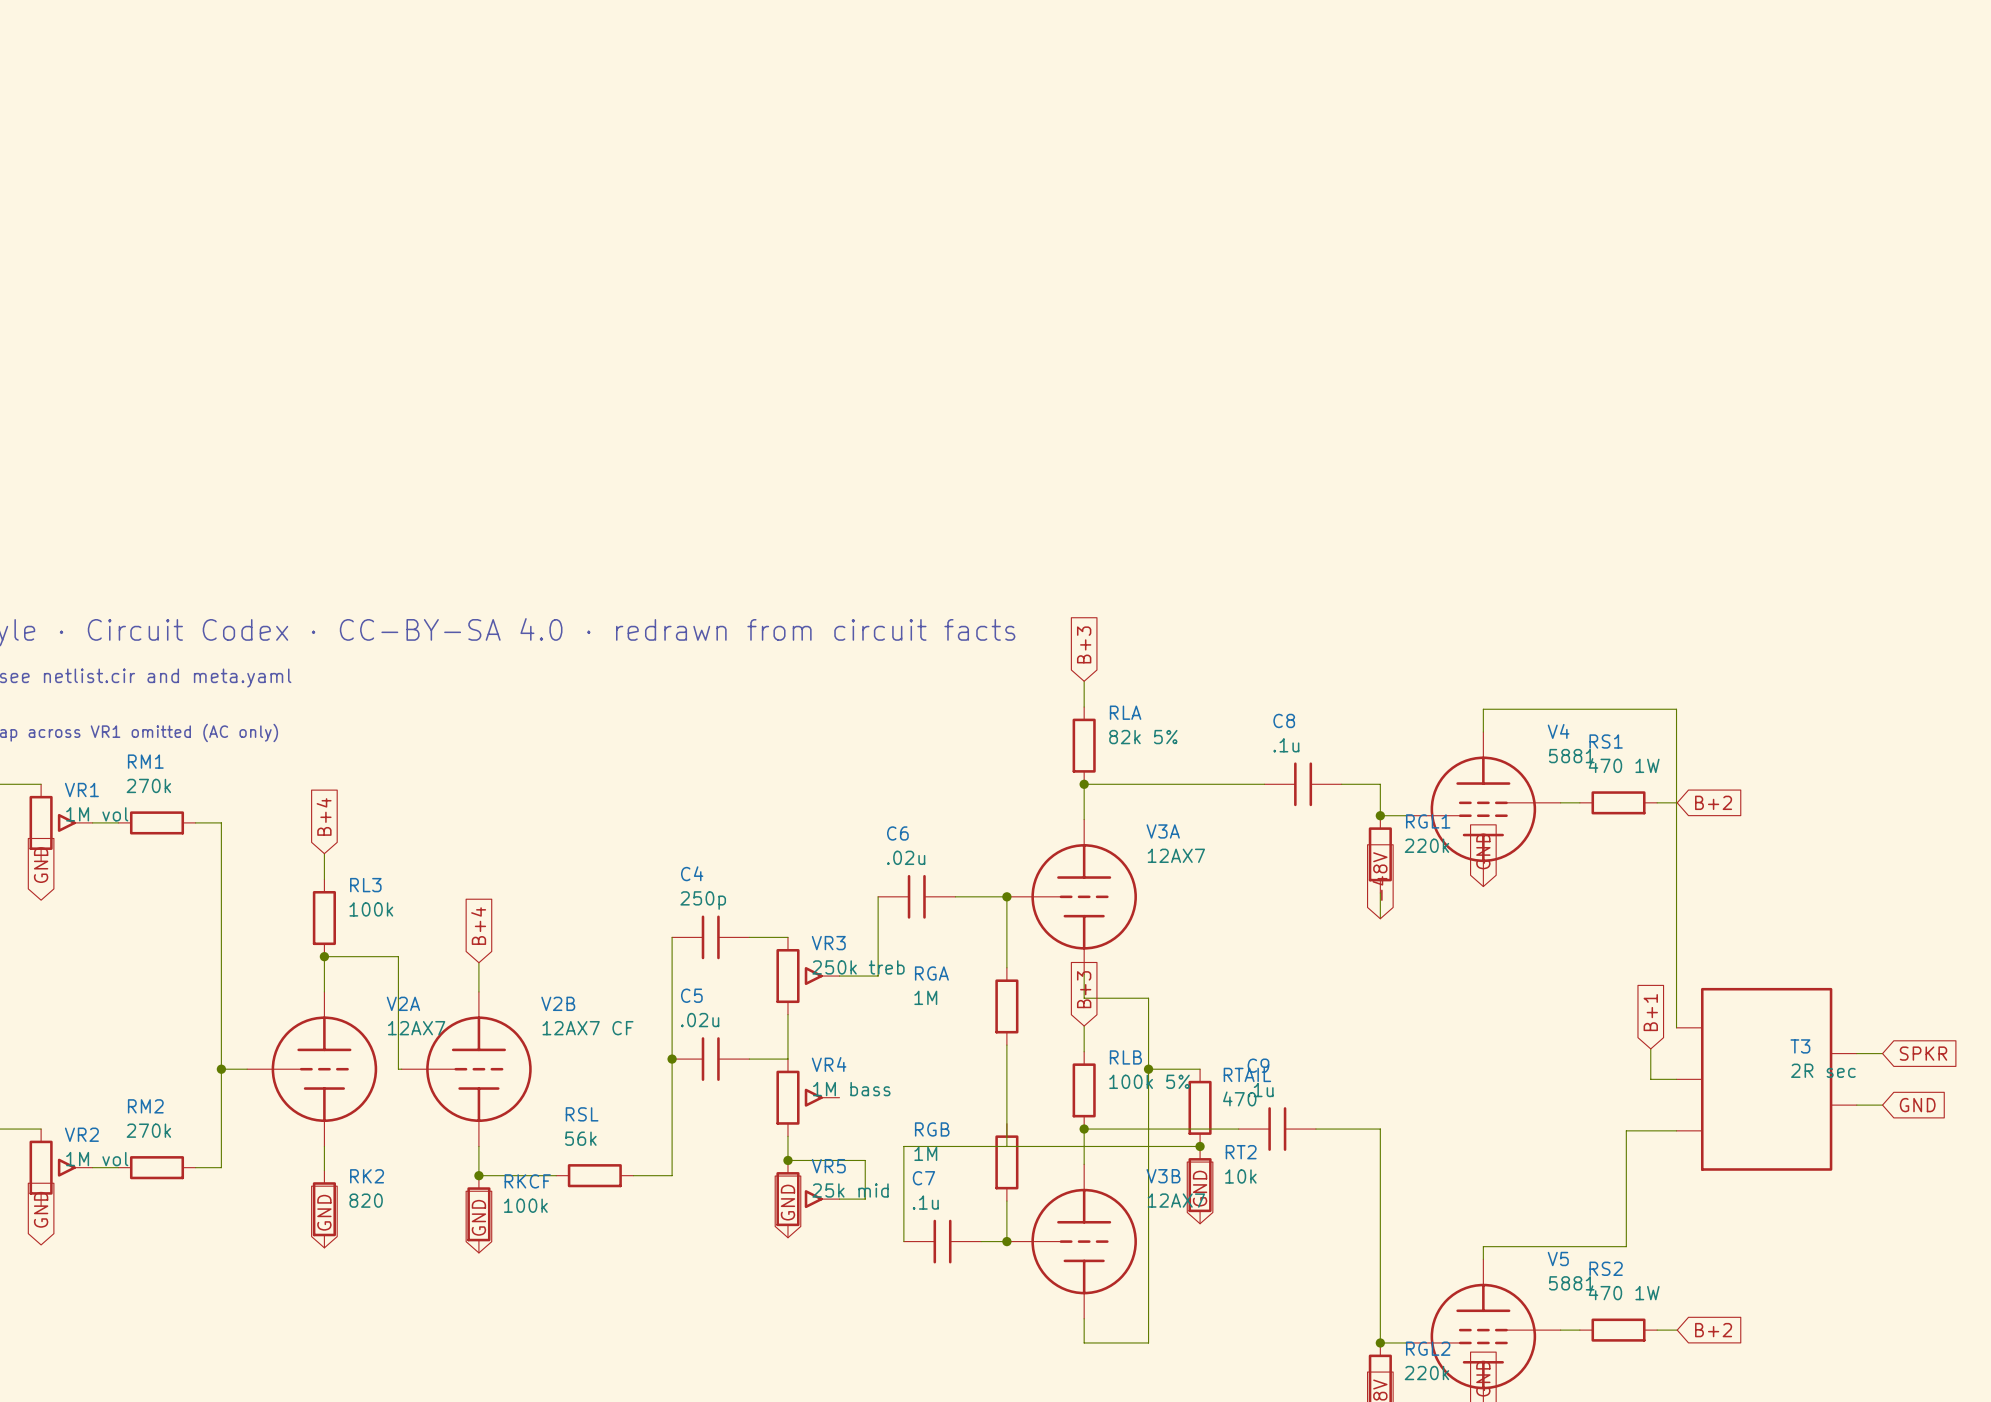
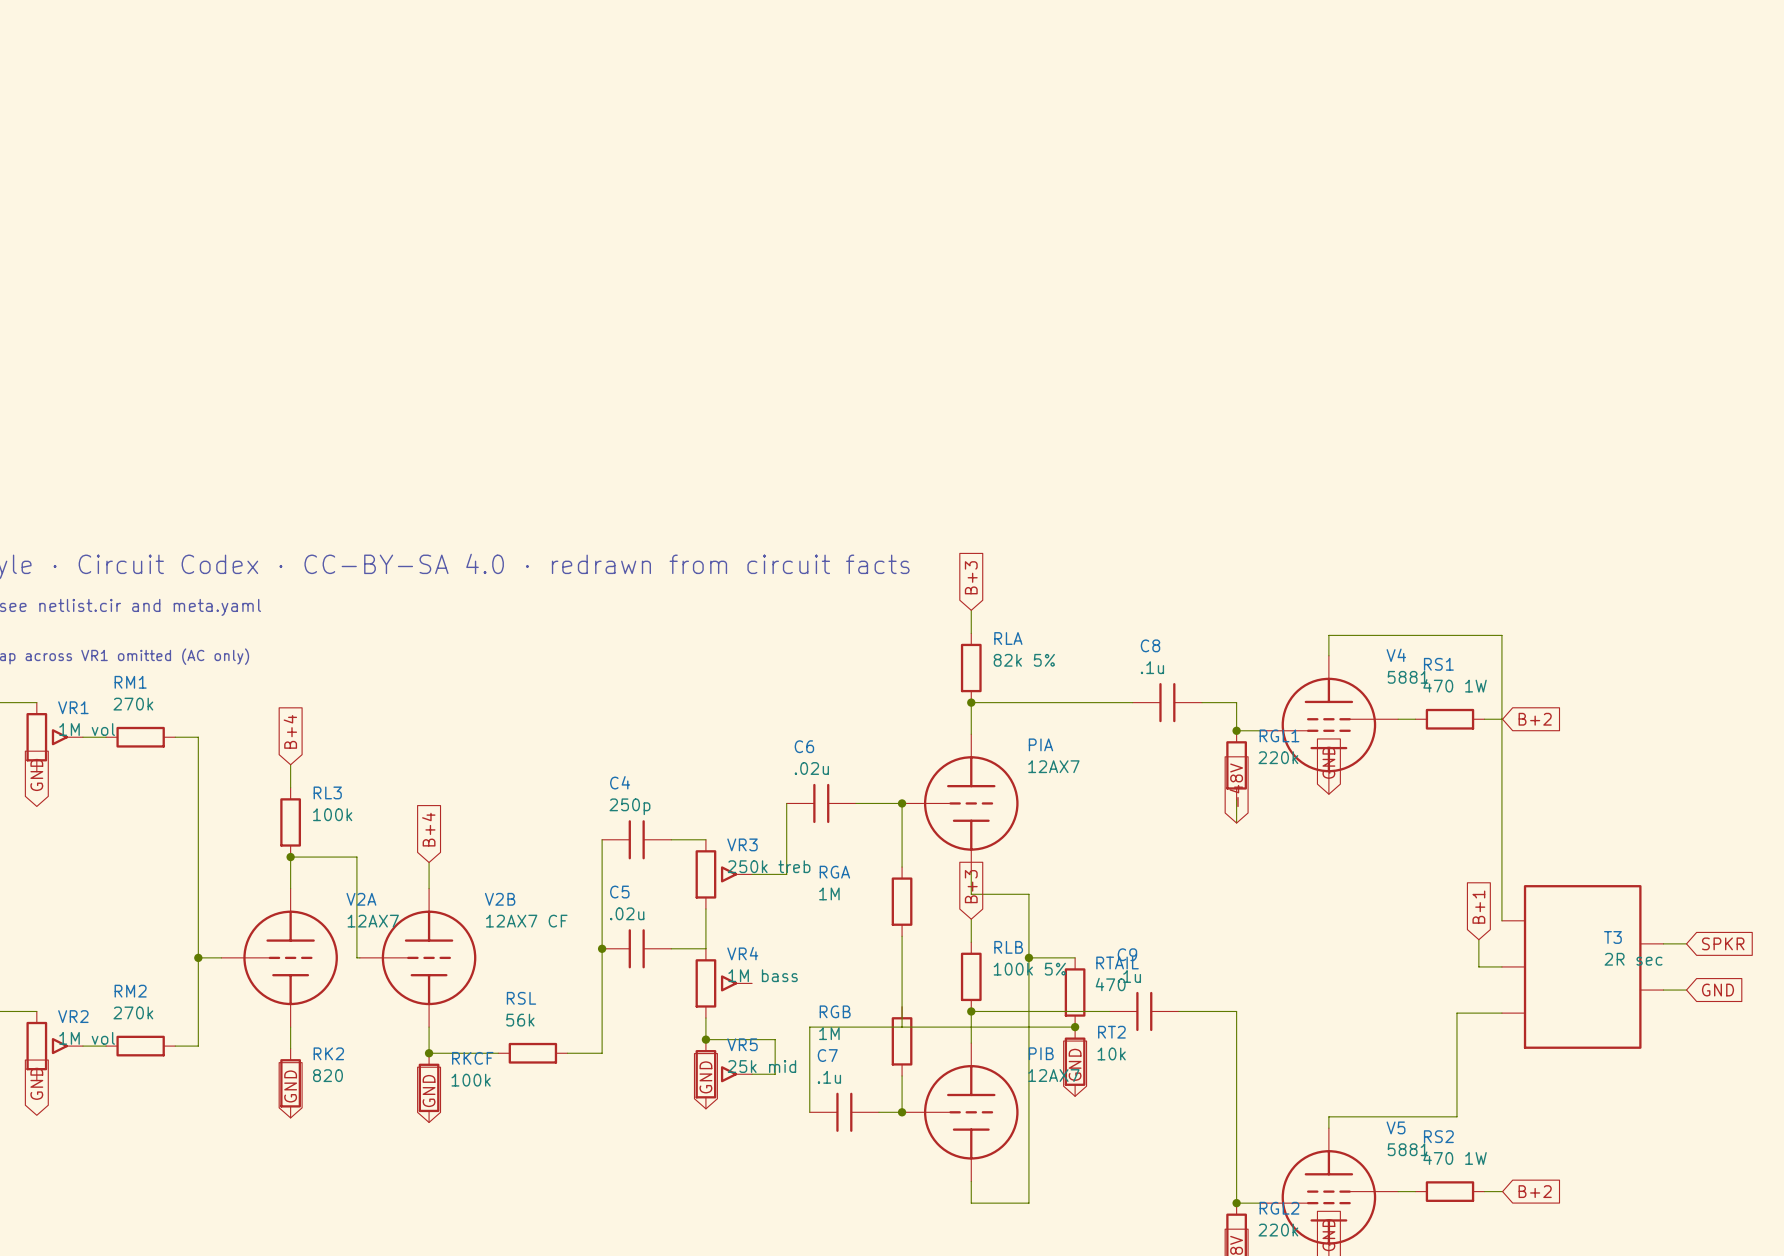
V3A name: V3A (1163, 831) -> PIA (1040, 744)
V3B name: V3B (1163, 1176) -> PIB (1041, 1053)

